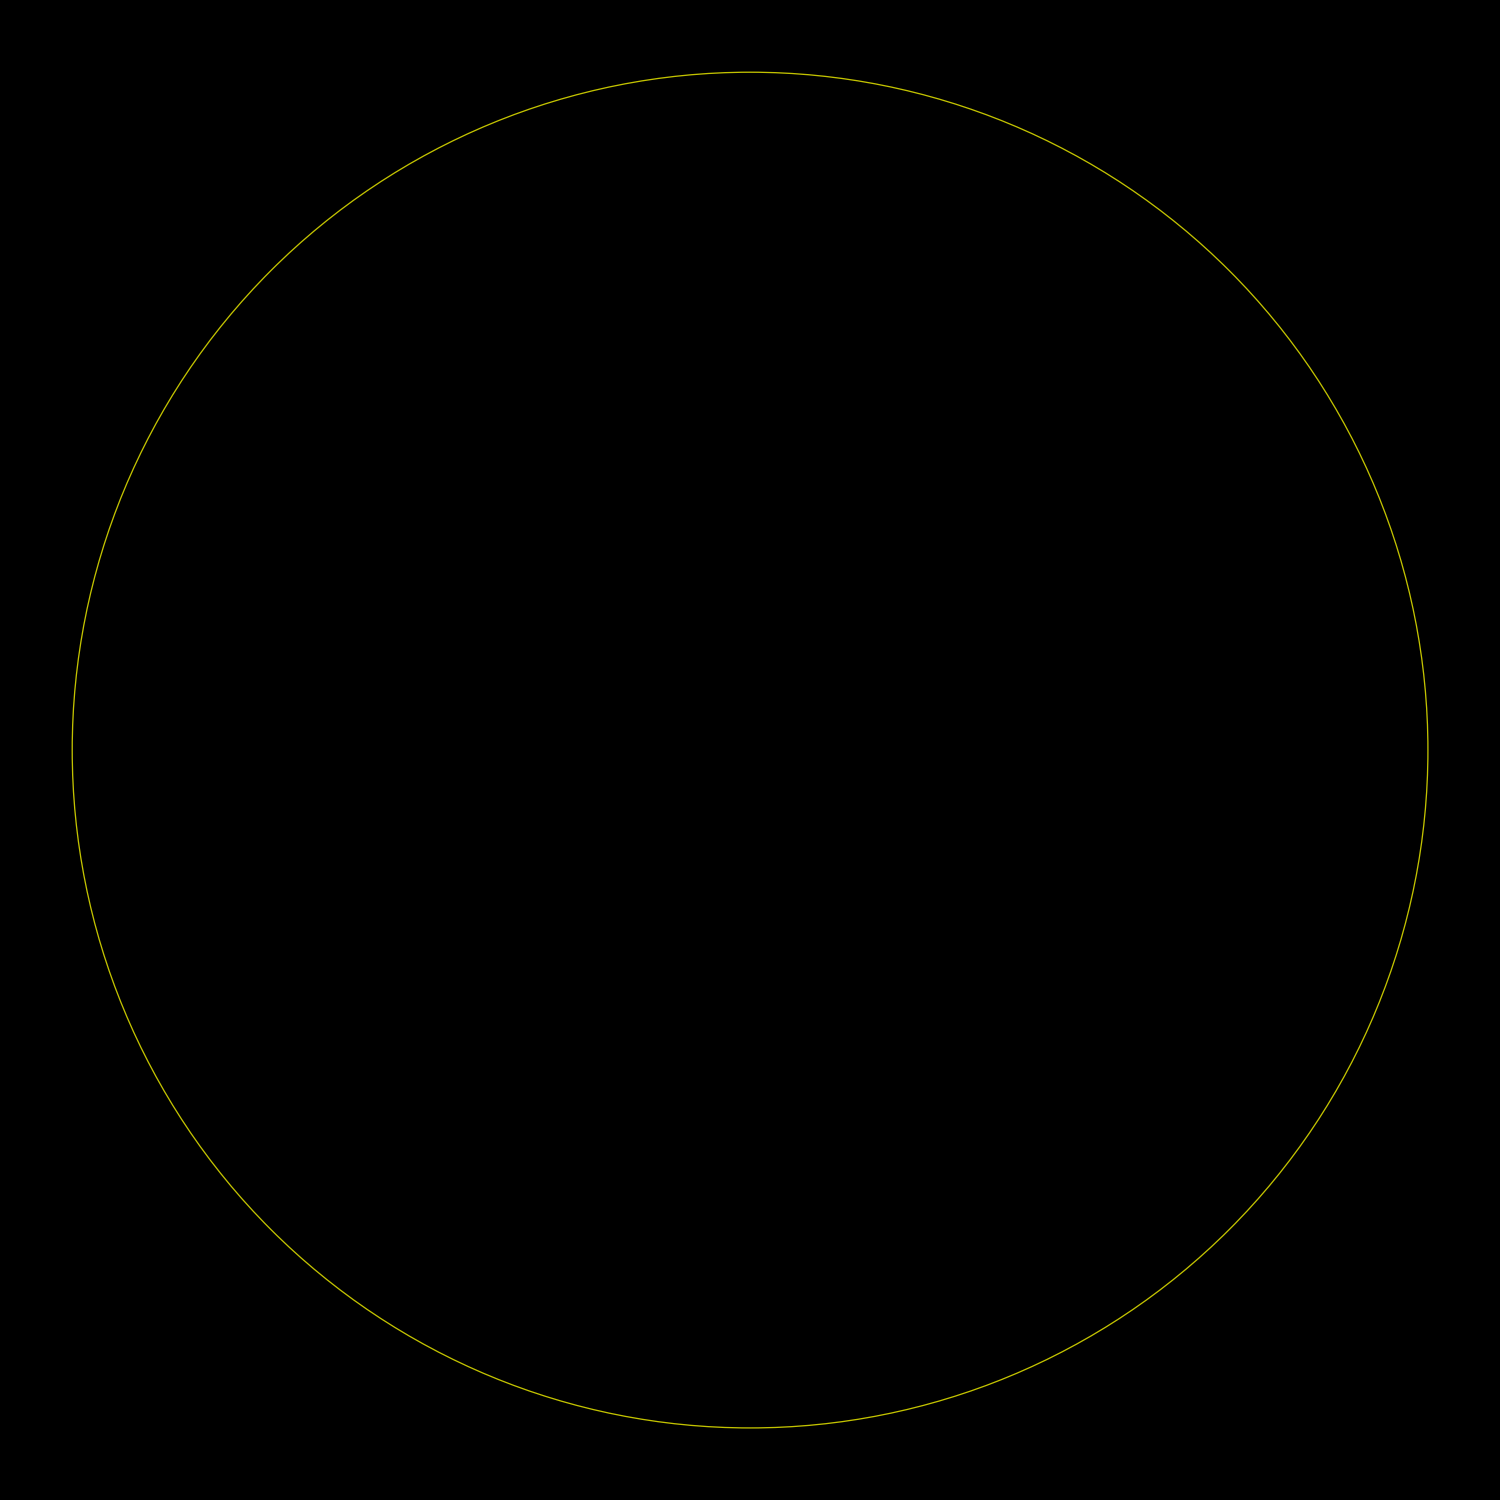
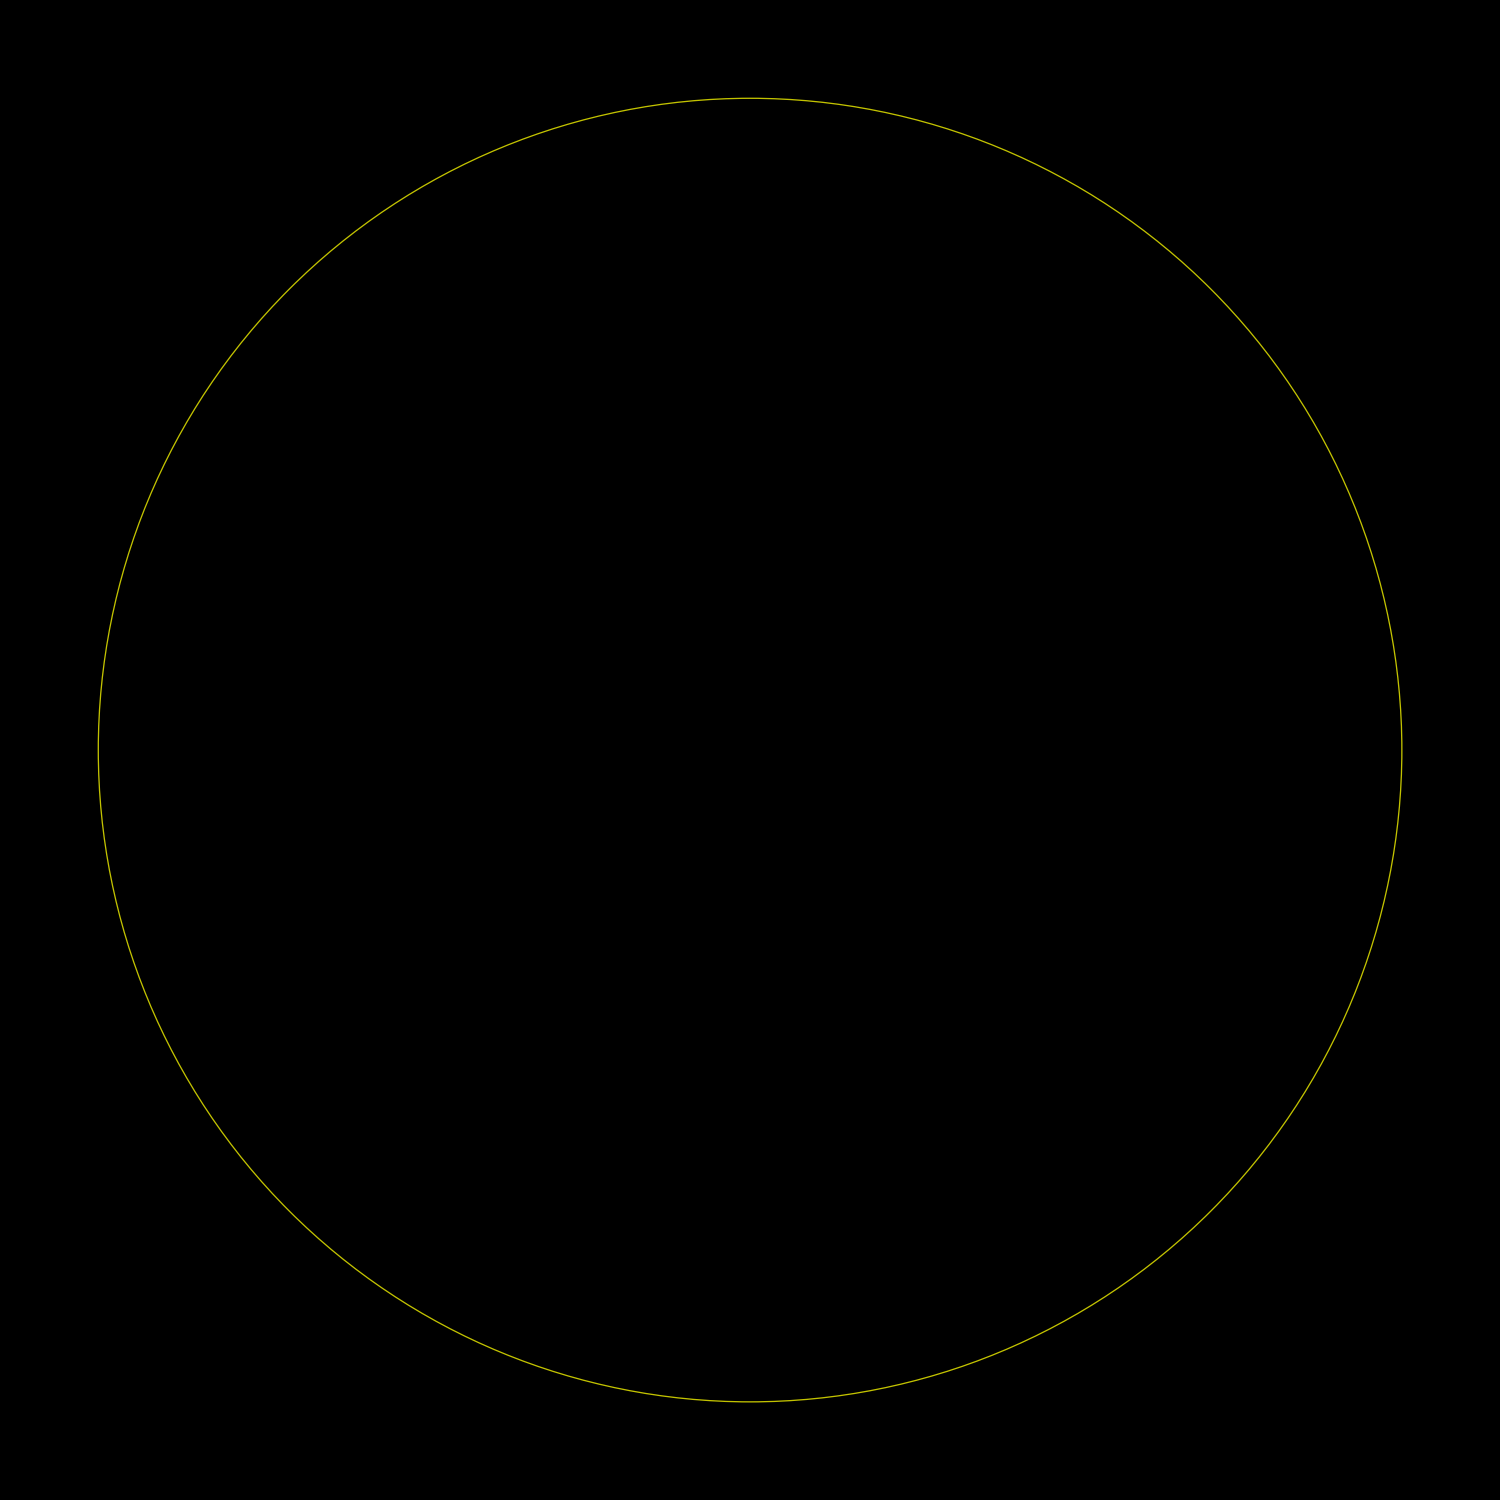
round board edge size: [71, 71, 1429, 1429] -> [97, 97, 1403, 1403]

